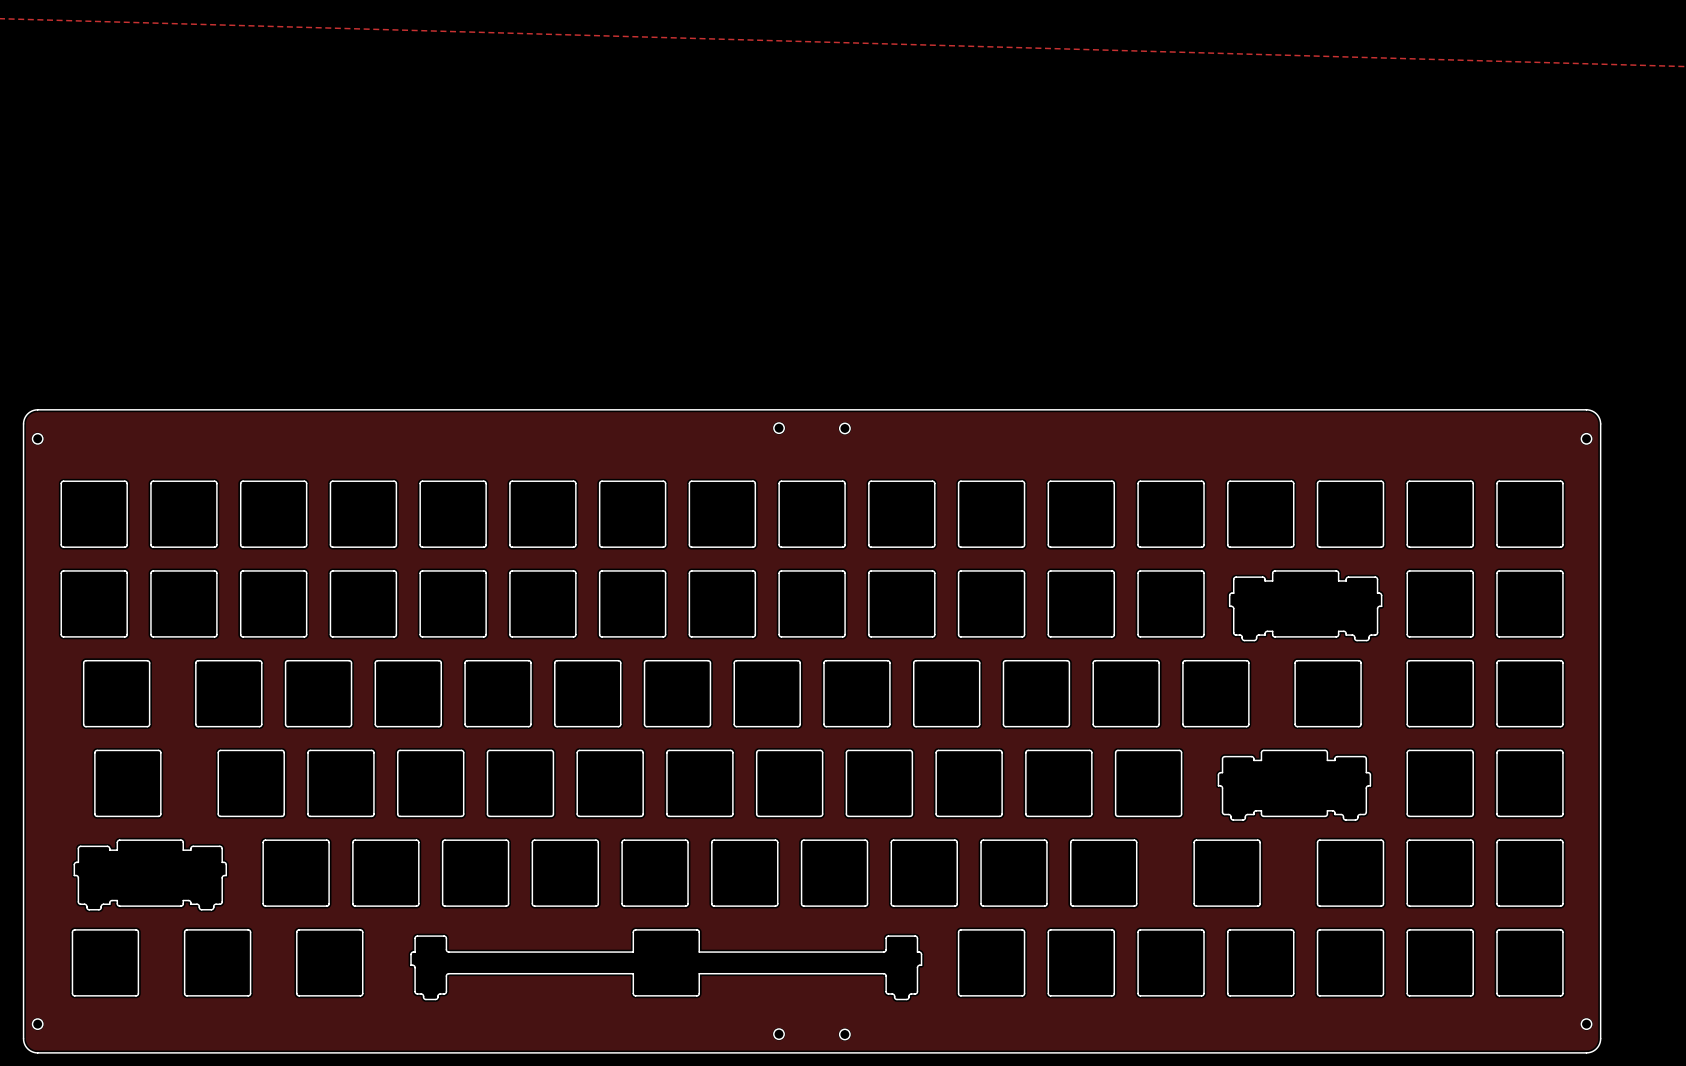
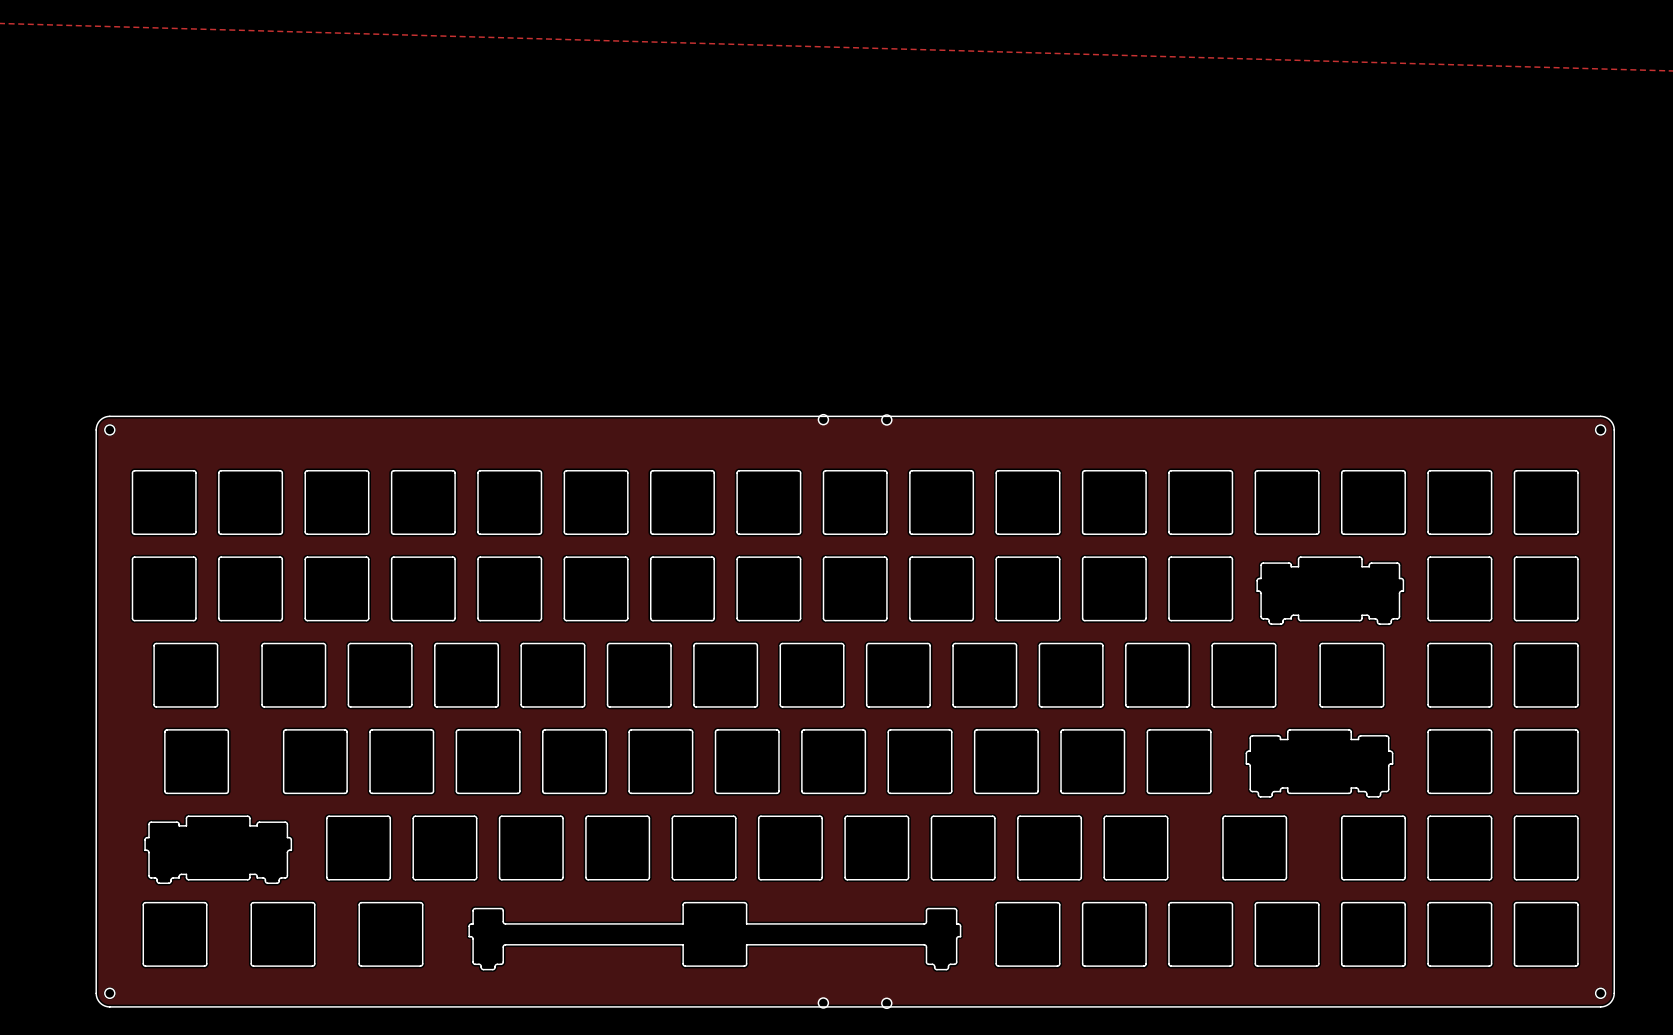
board edge: (23, 438) (24, 418) (29, 412) (37, 409) (1586, 409) (1595, 412) (1599, 418) (1600, 438) -> (96, 429) (100, 420) (109, 416) (1600, 416) (1610, 420) (1614, 429)
board edge: (23, 1024) (24, 1044) (30, 1051) (37, 1052) (1586, 1052) (1593, 1051) (1599, 1044) (1600, 1024) -> (96, 993) (100, 1002) (109, 1006) (1600, 1006) (1610, 1002) (1614, 993)

